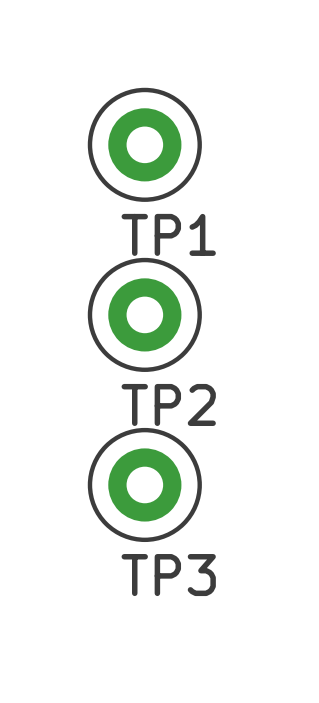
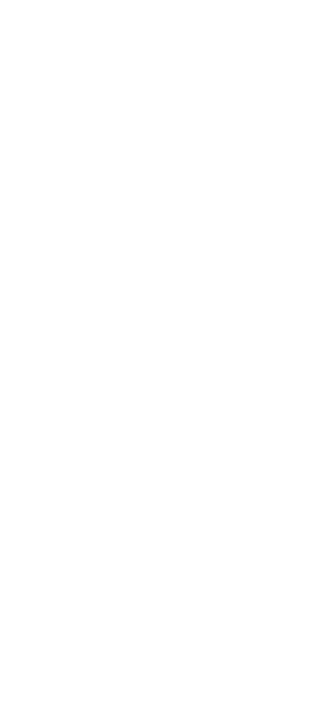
TP1: (144, 144) -> none
TP2: (144, 314) -> none
TP3: (144, 484) -> none

